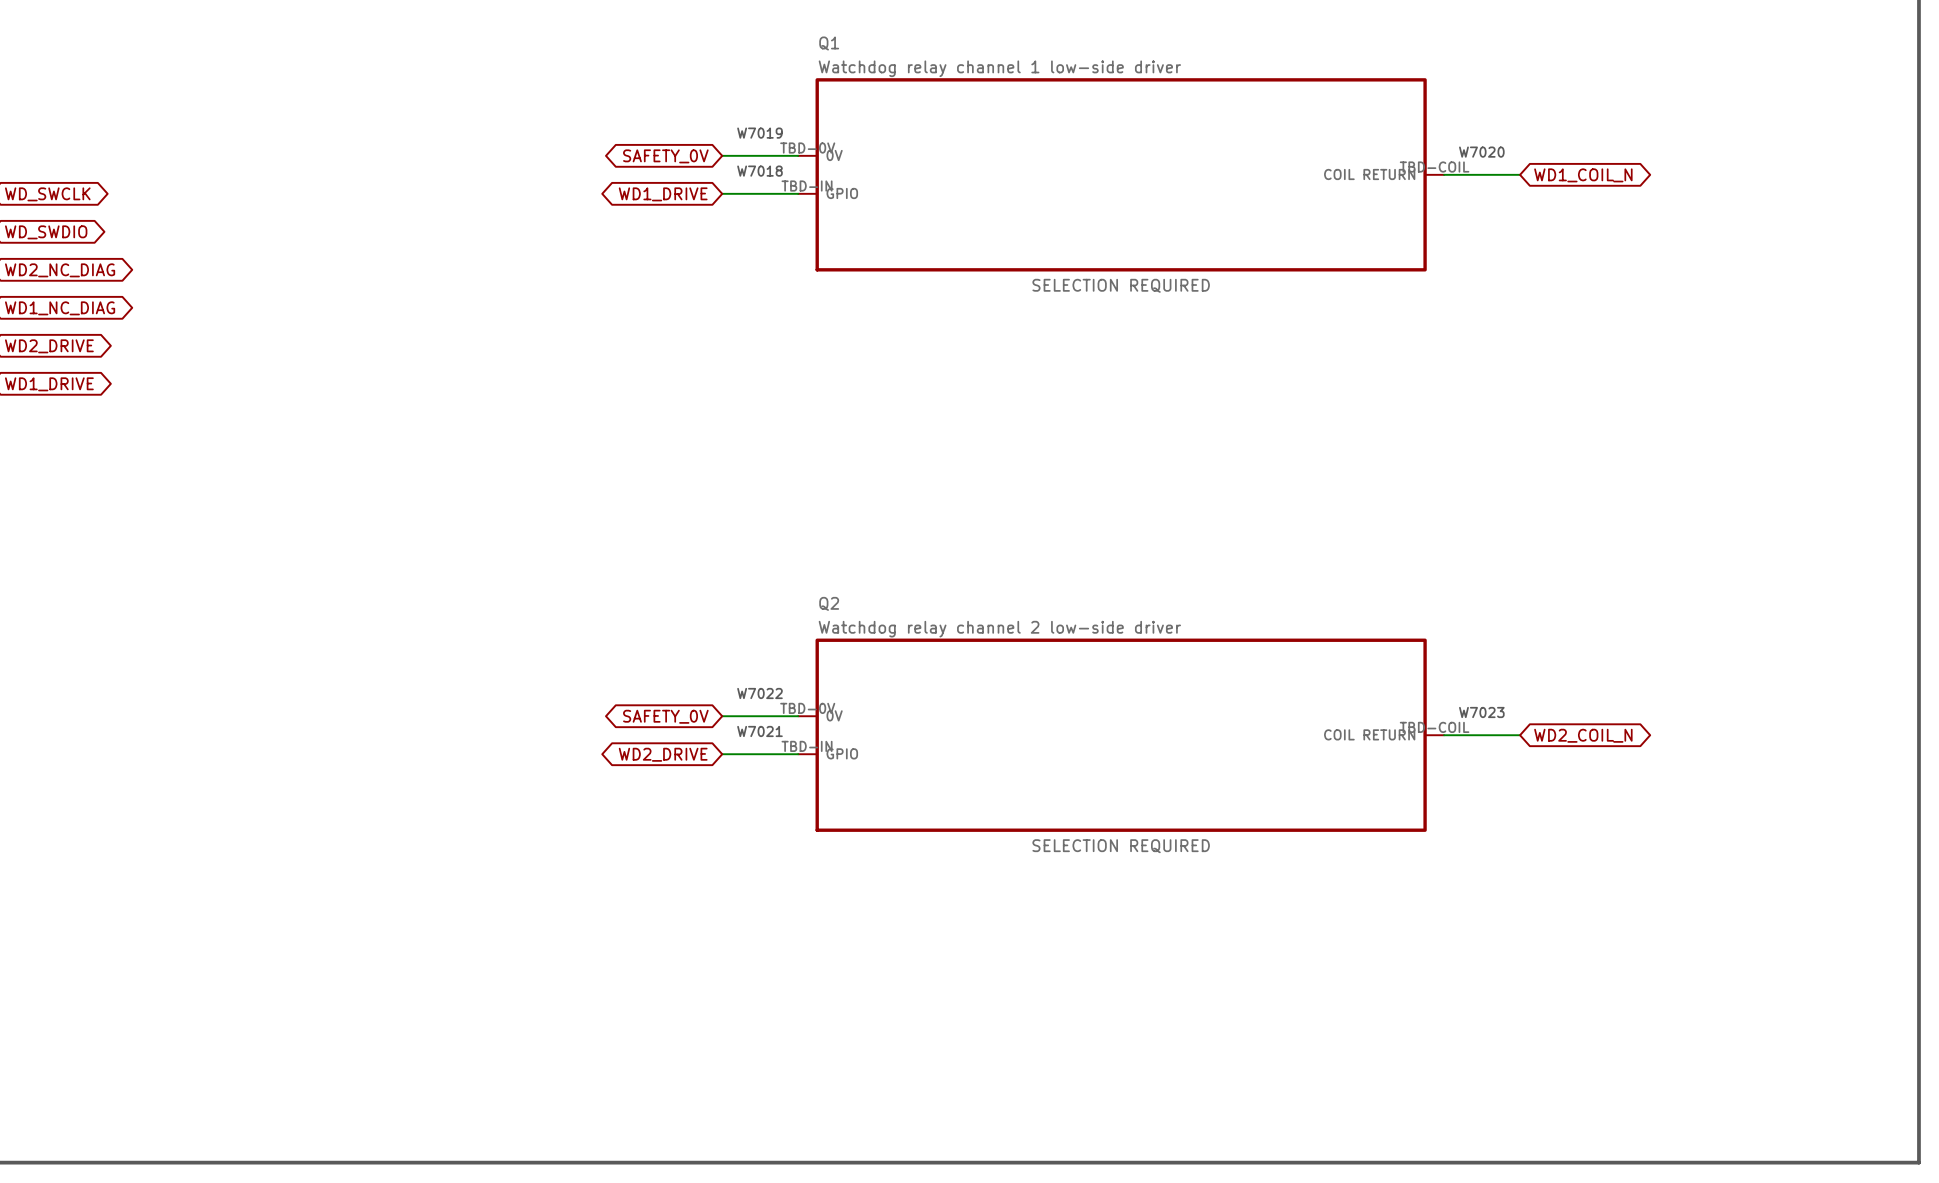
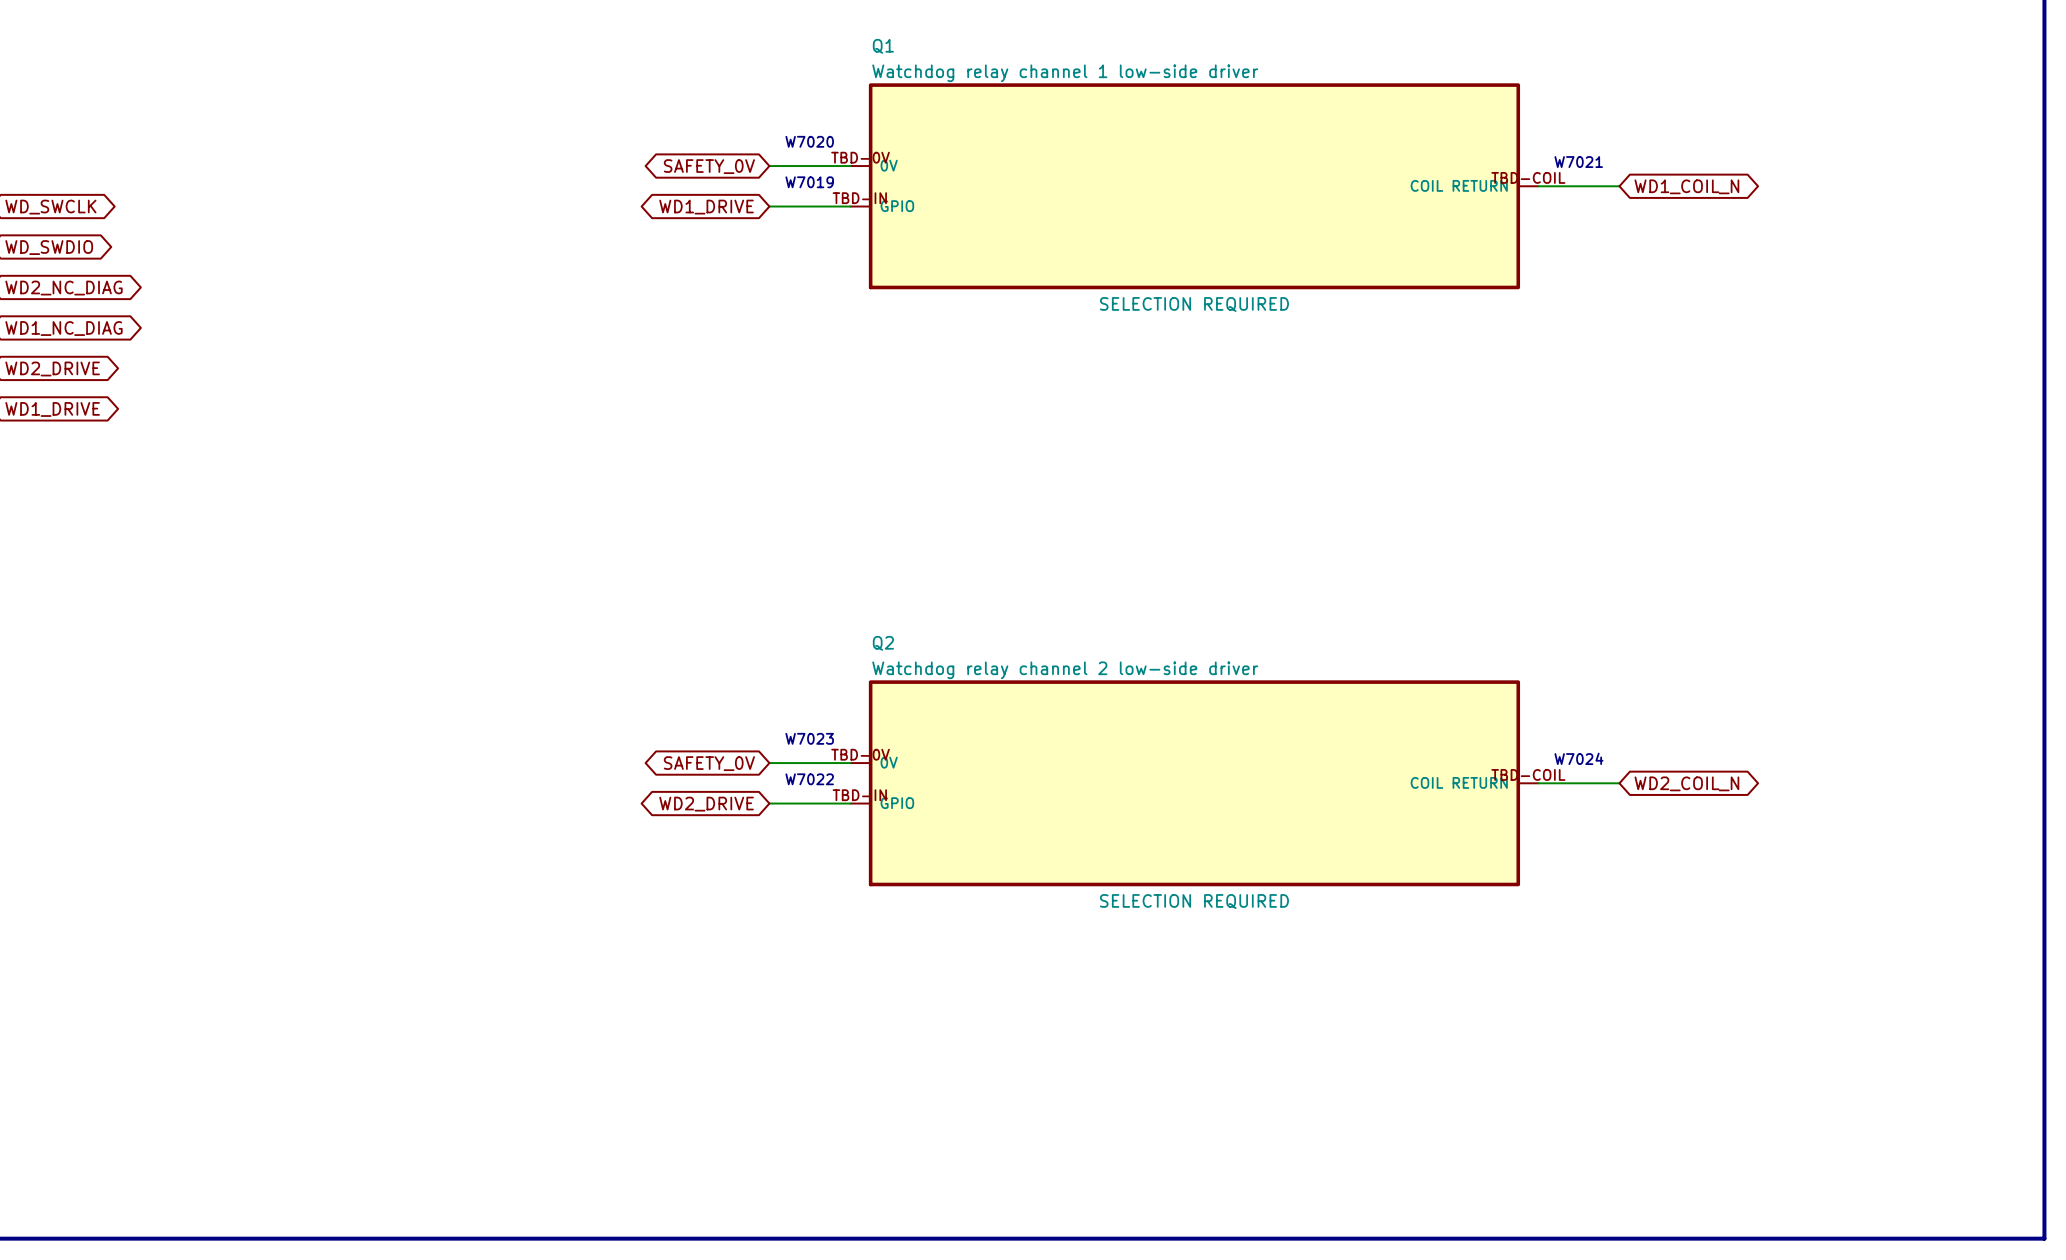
text: W7019 (759, 133) -> W7020 (809, 141)
text: W7020 (1481, 152) -> W7021 (1578, 162)
text: W7018 (759, 171) -> W7019 (809, 182)
text: W7022 (759, 693) -> W7023 (809, 738)
text: W7023 (1481, 712) -> W7024 (1578, 758)
text: W7021 (759, 731) -> W7022 (809, 779)

